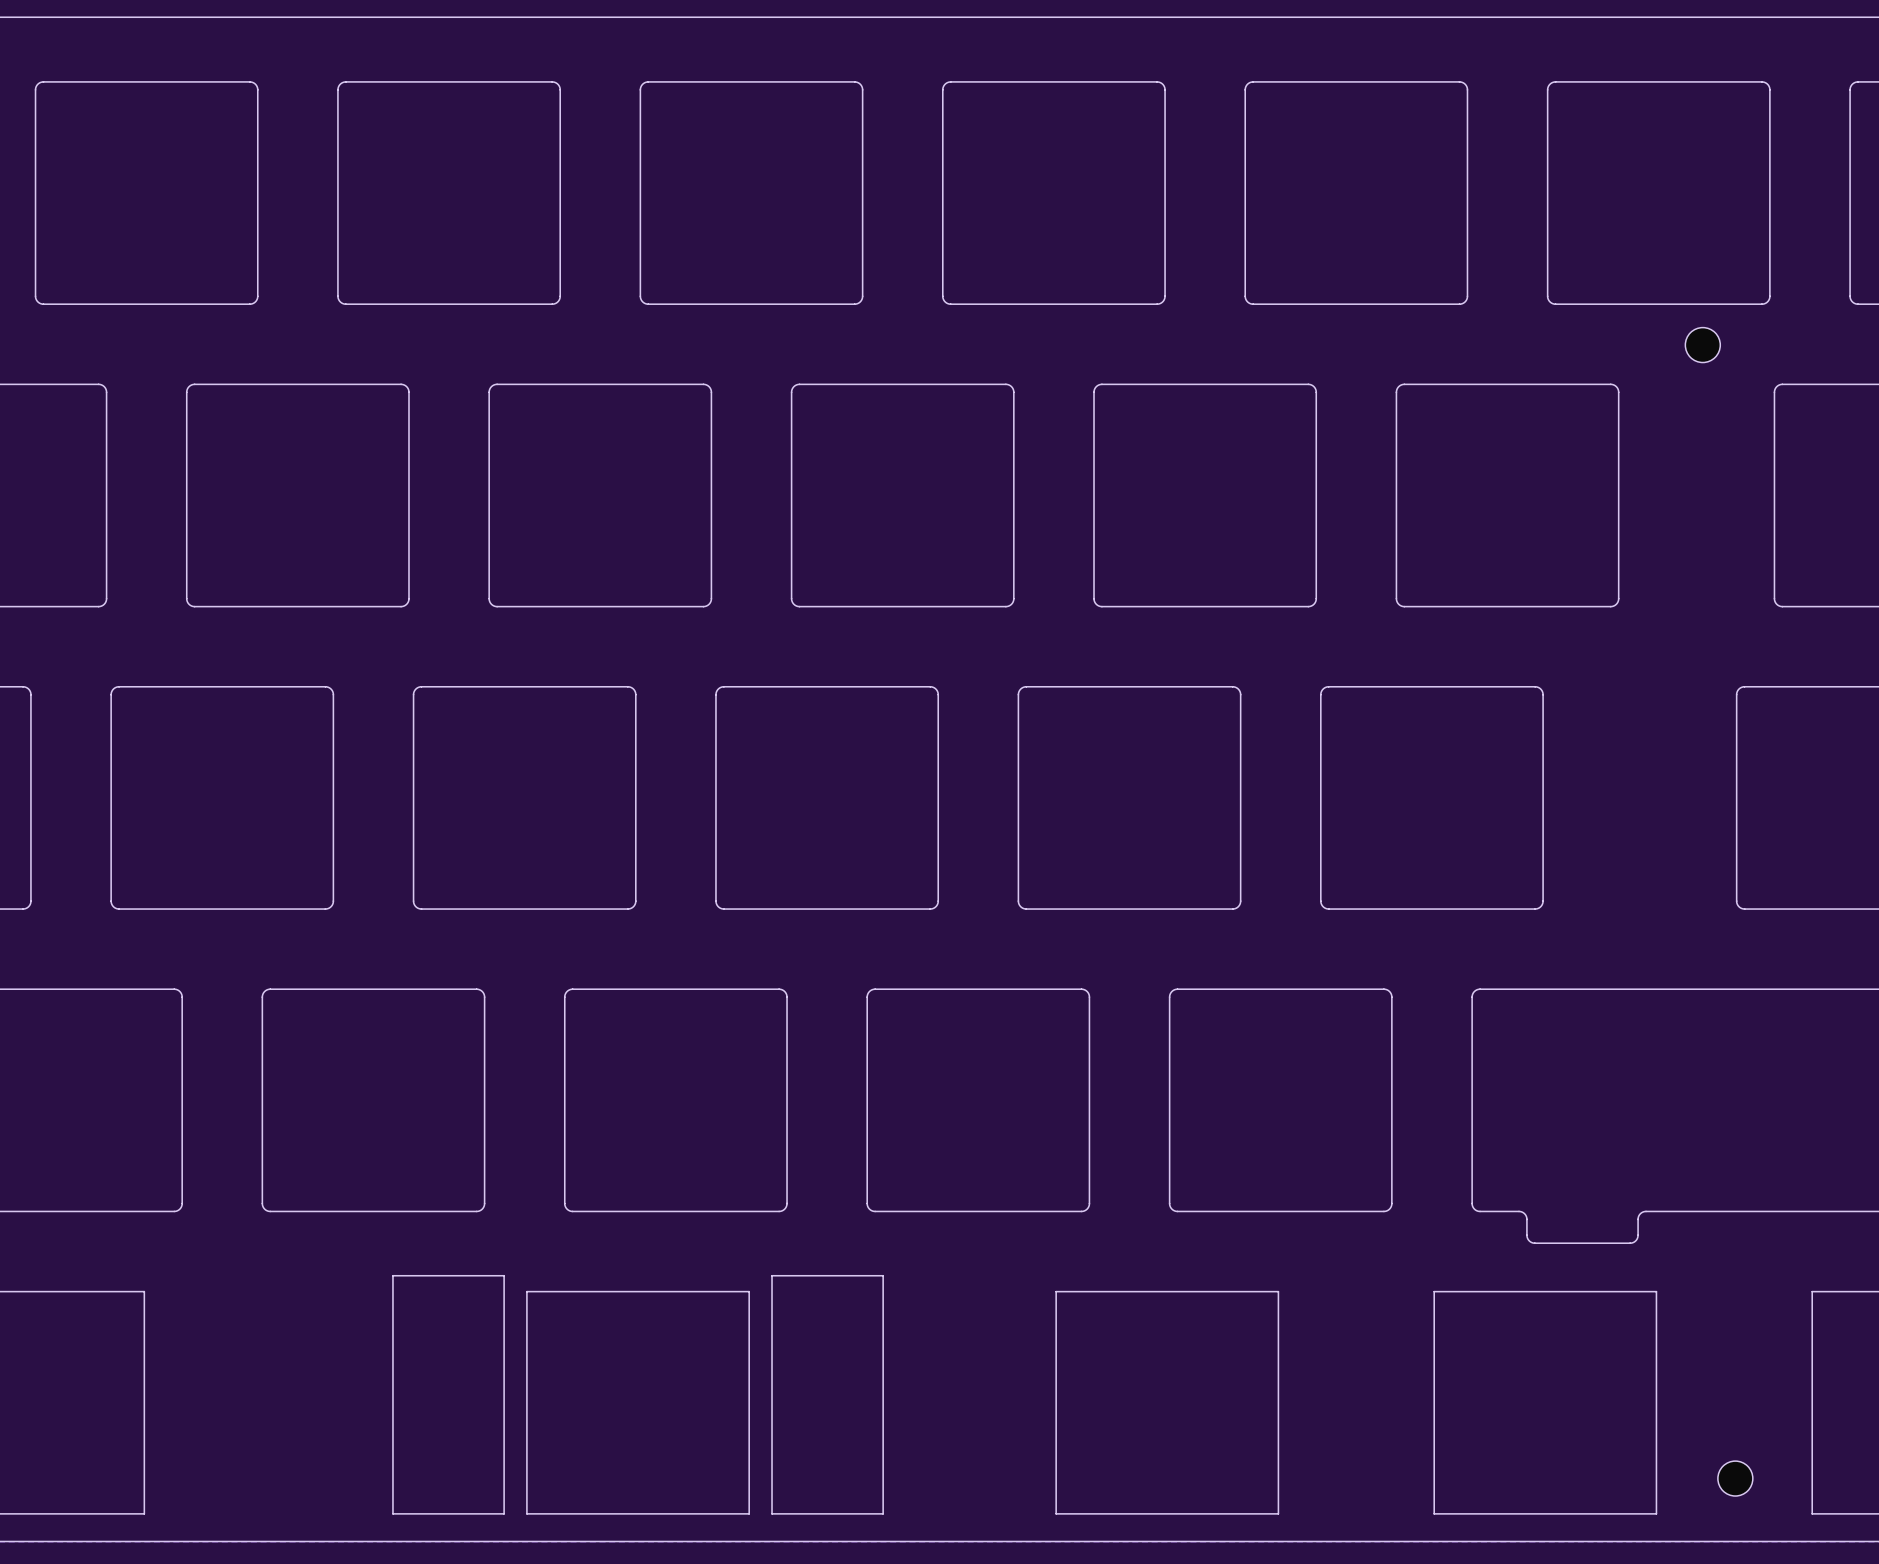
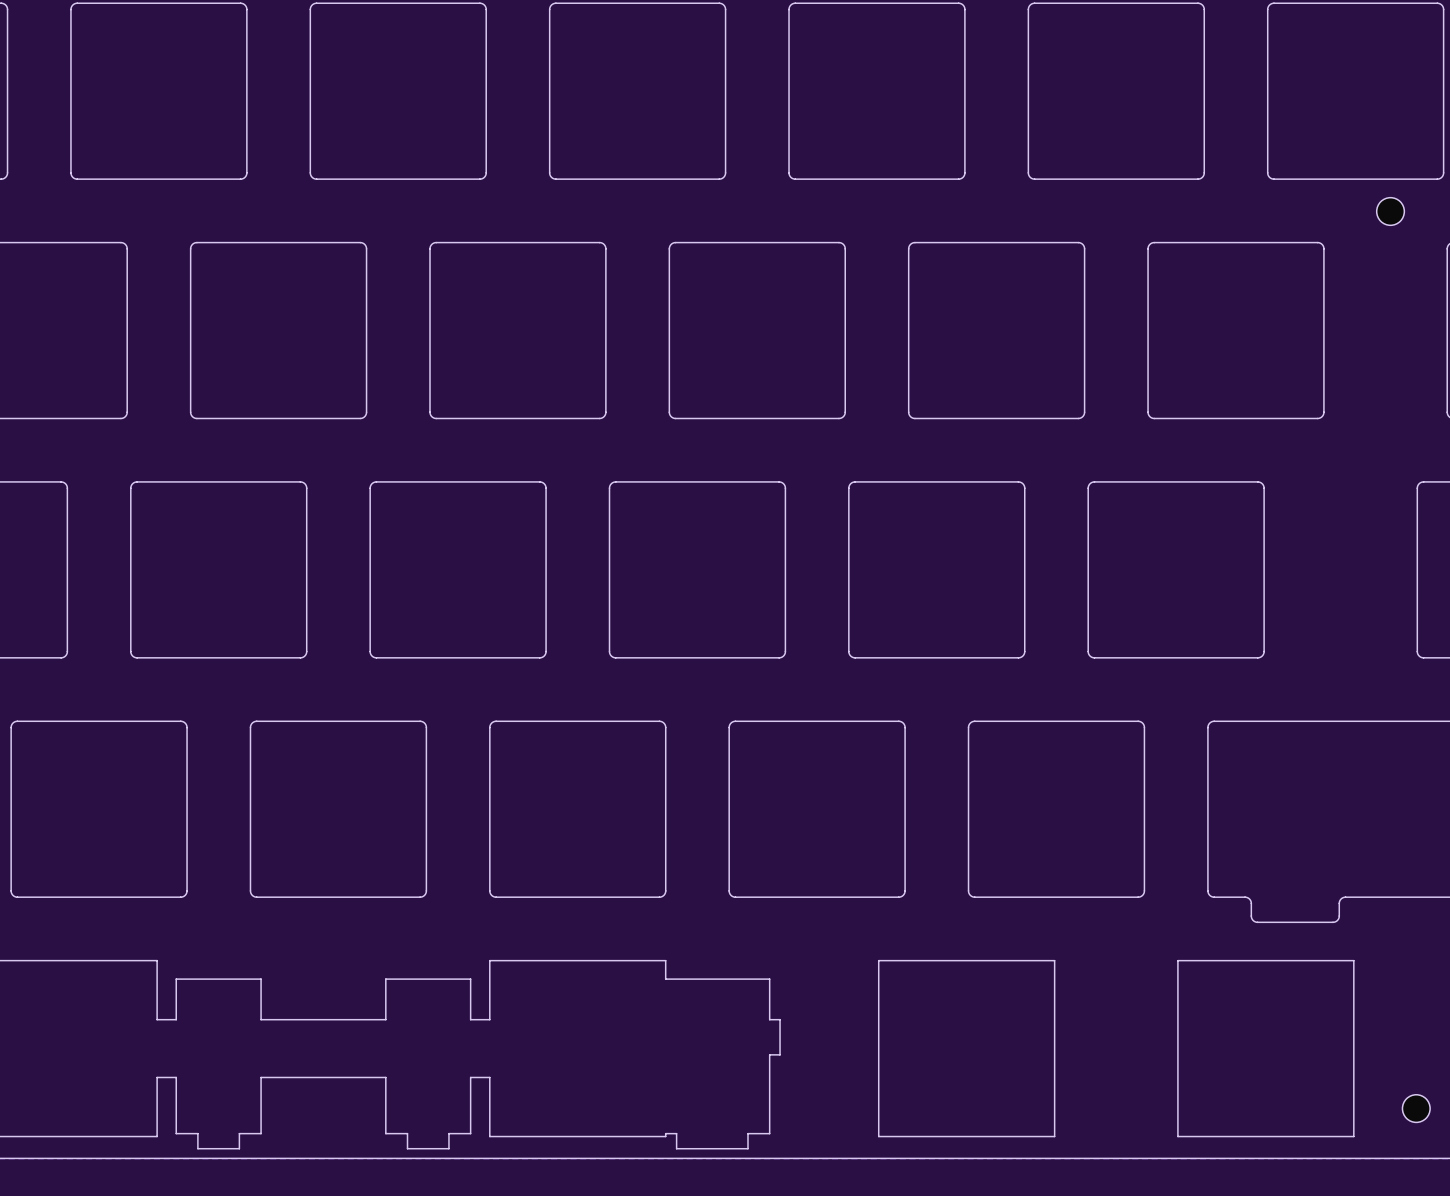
board edge: (504, 1275) (504, 1513) (392, 1513) (392, 1275) (504, 1275) -> none
board edge: (883, 1275) (772, 1275) (772, 1513) (883, 1513) (883, 1275) -> none
board edge: (749, 1291) (526, 1291) (526, 1513) (749, 1513) (749, 1291) -> none
board edge: (144, 1366) (144, 1439) -> (157, 1019) (176, 1019) (176, 979) (261, 979) (261, 1019) (385, 1019) (385, 979) (470, 979) (470, 1019) (489, 1019) (489, 960) (665, 960) (665, 979) (769, 979) (769, 1019) (780, 1019) (780, 1054) (769, 1054) (769, 1133) (747, 1133) (747, 1148) (676, 1148) (676, 1133) (665, 1133) (665, 1136) (489, 1136) (489, 1077) (470, 1077) (470, 1133) (448, 1133) (448, 1148) (407, 1148) (407, 1133) (385, 1133) (385, 1077) (261, 1077) (261, 1133) (239, 1133) (239, 1148) (197, 1148) (197, 1133) (176, 1133) (176, 1077) (157, 1077)

